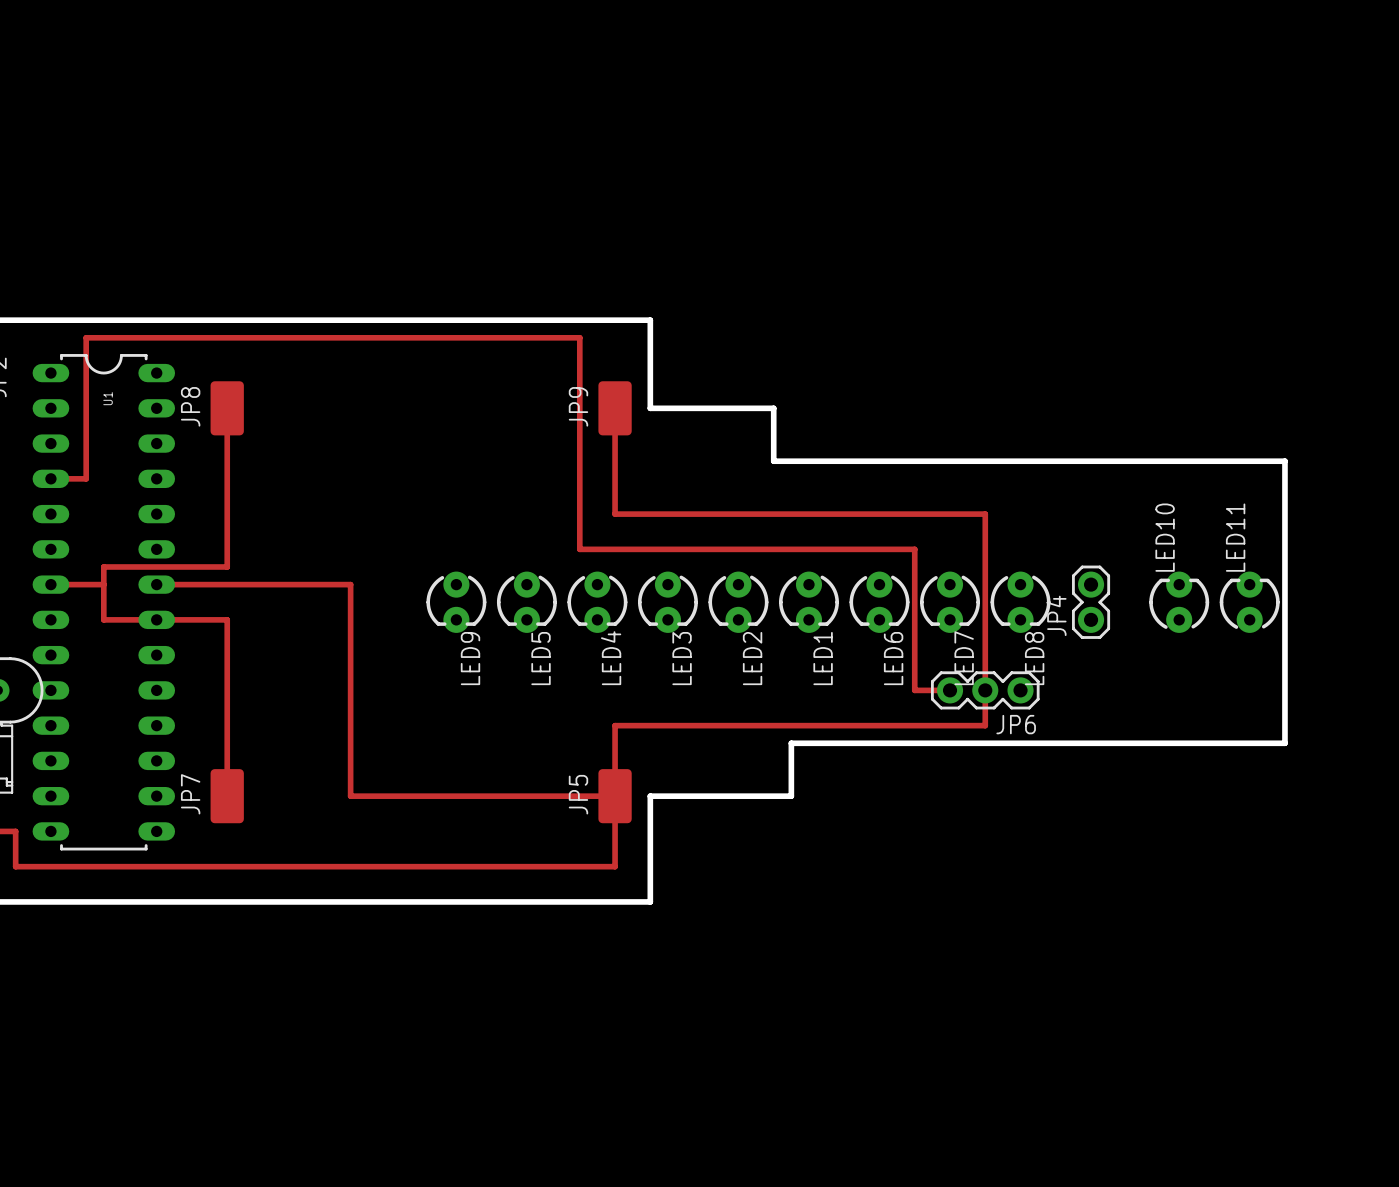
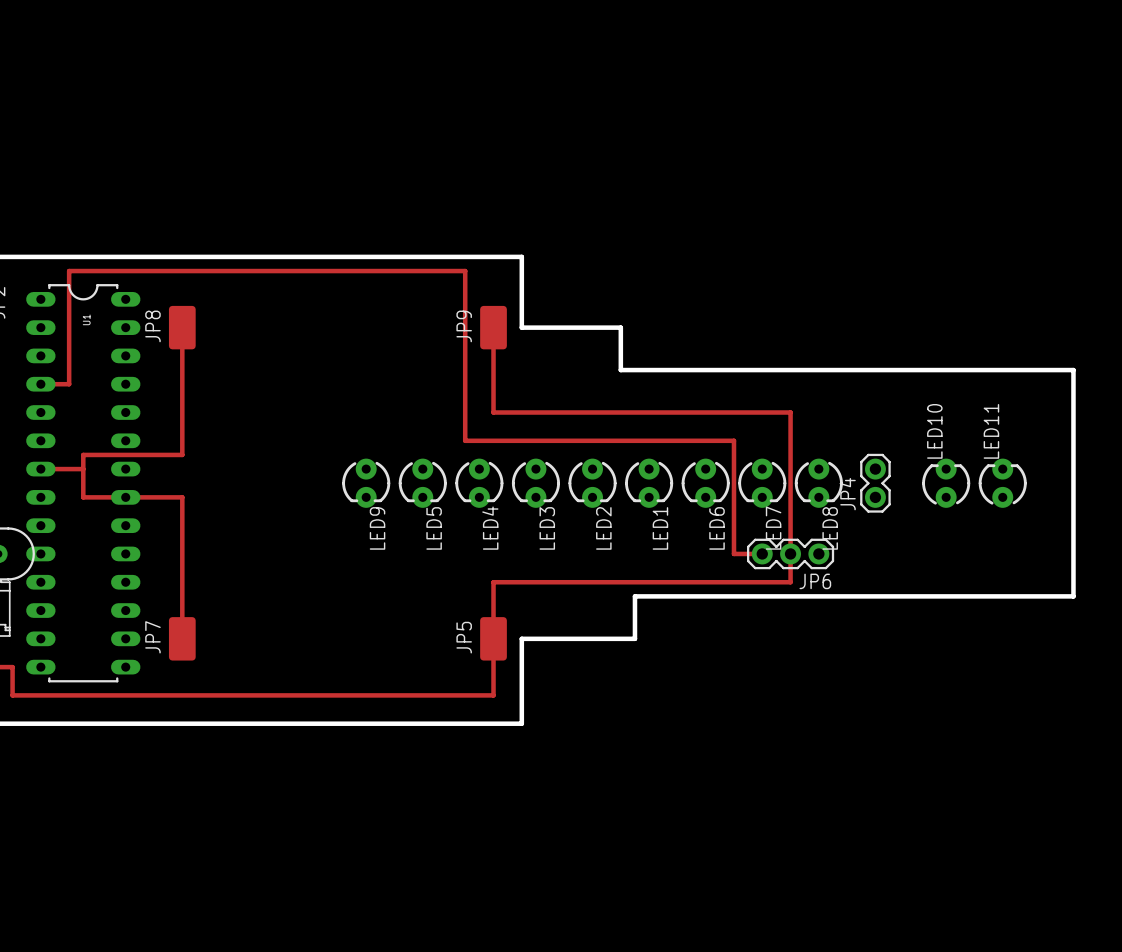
board edge: (1284, 461) (1284, 743) -> (1031, 370) (1073, 370) (1073, 596) (1031, 596)
track: (156, 584) (350, 584) (350, 796) (615, 796) -> none

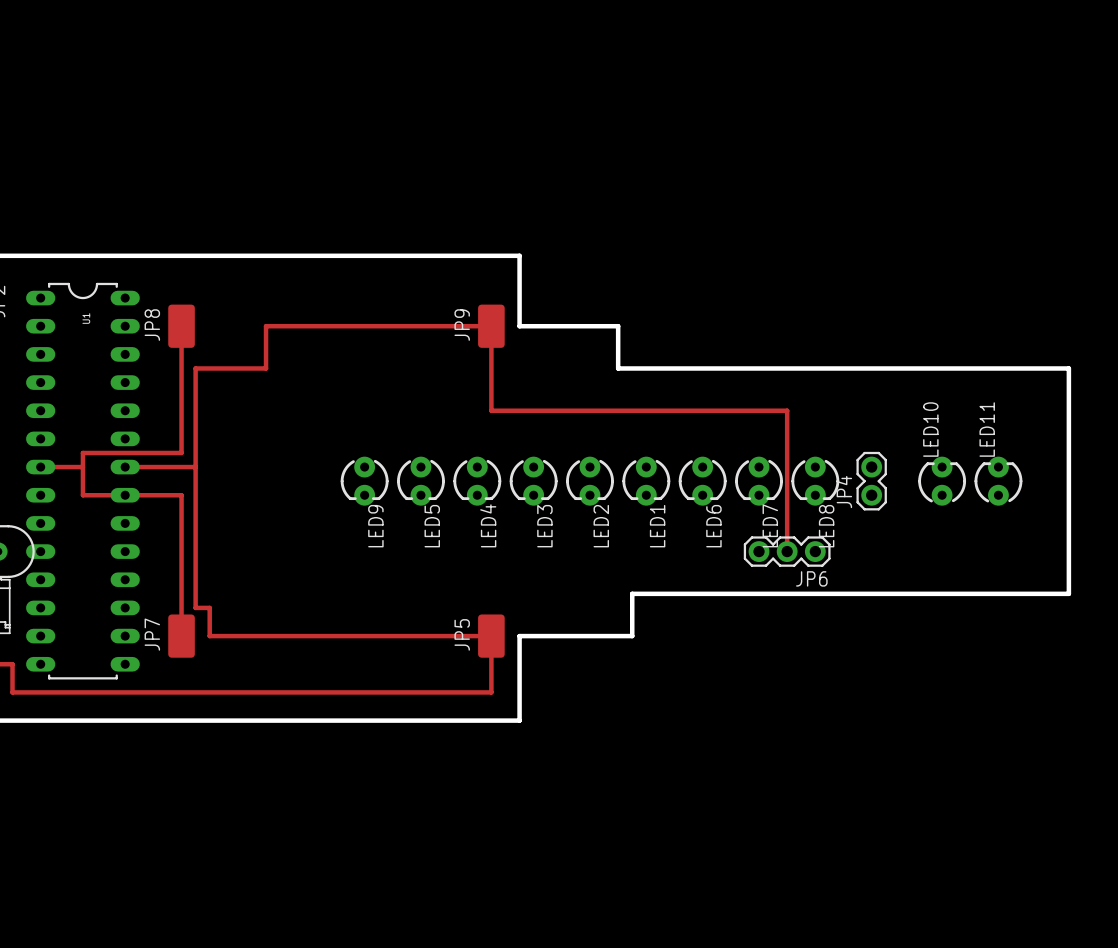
track: (40, 384) (69, 384) (69, 271) (465, 271) (465, 440) (733, 440) (733, 553) (762, 553) -> none
track: none -> (125, 467) (195, 467)
track: (790, 553) (790, 582) (493, 582) (493, 638) -> (491, 326) (266, 326) (266, 368) (195, 368) (195, 607) (209, 607) (209, 636) (491, 636)

